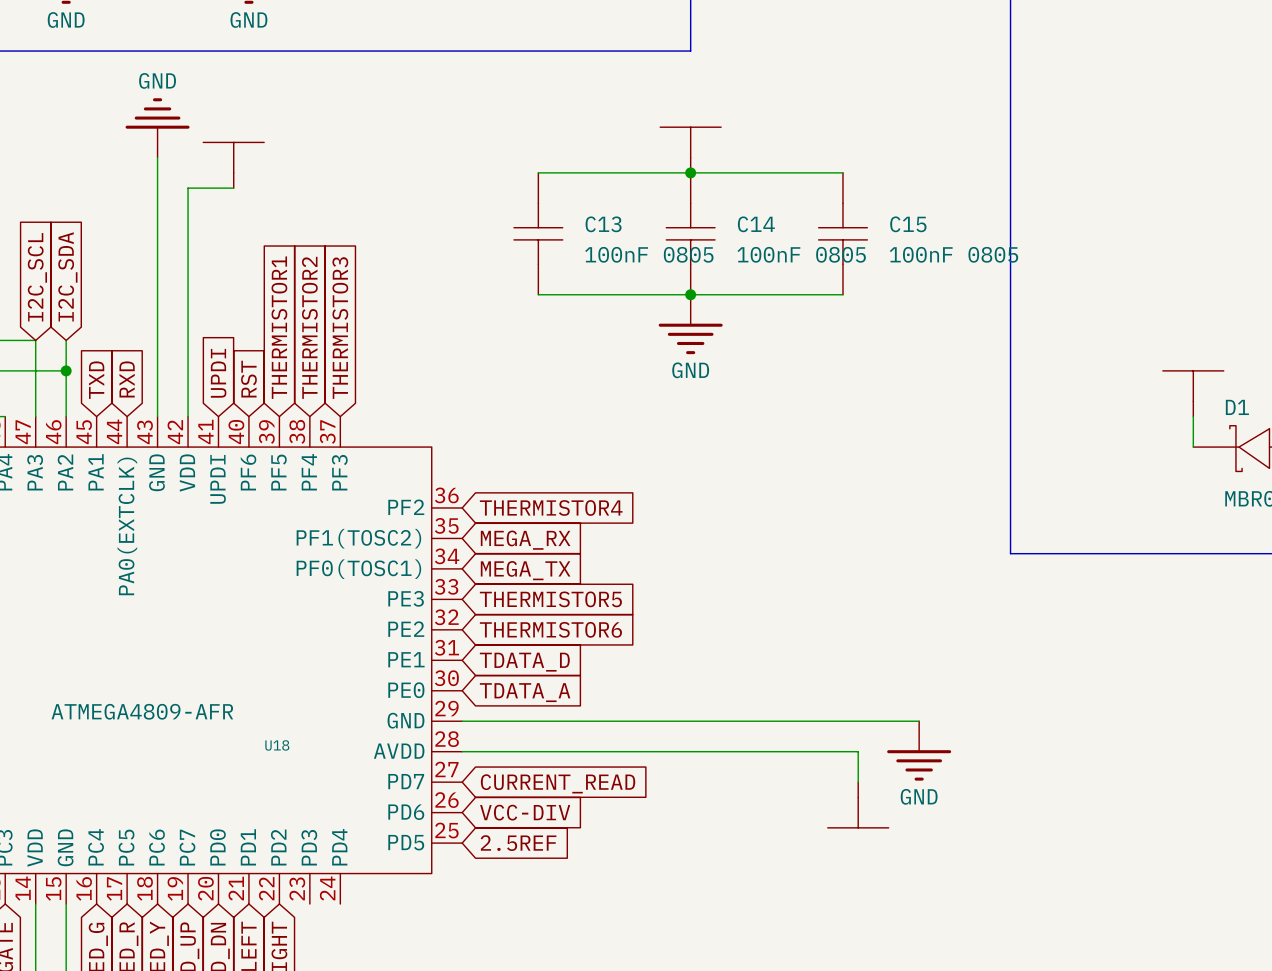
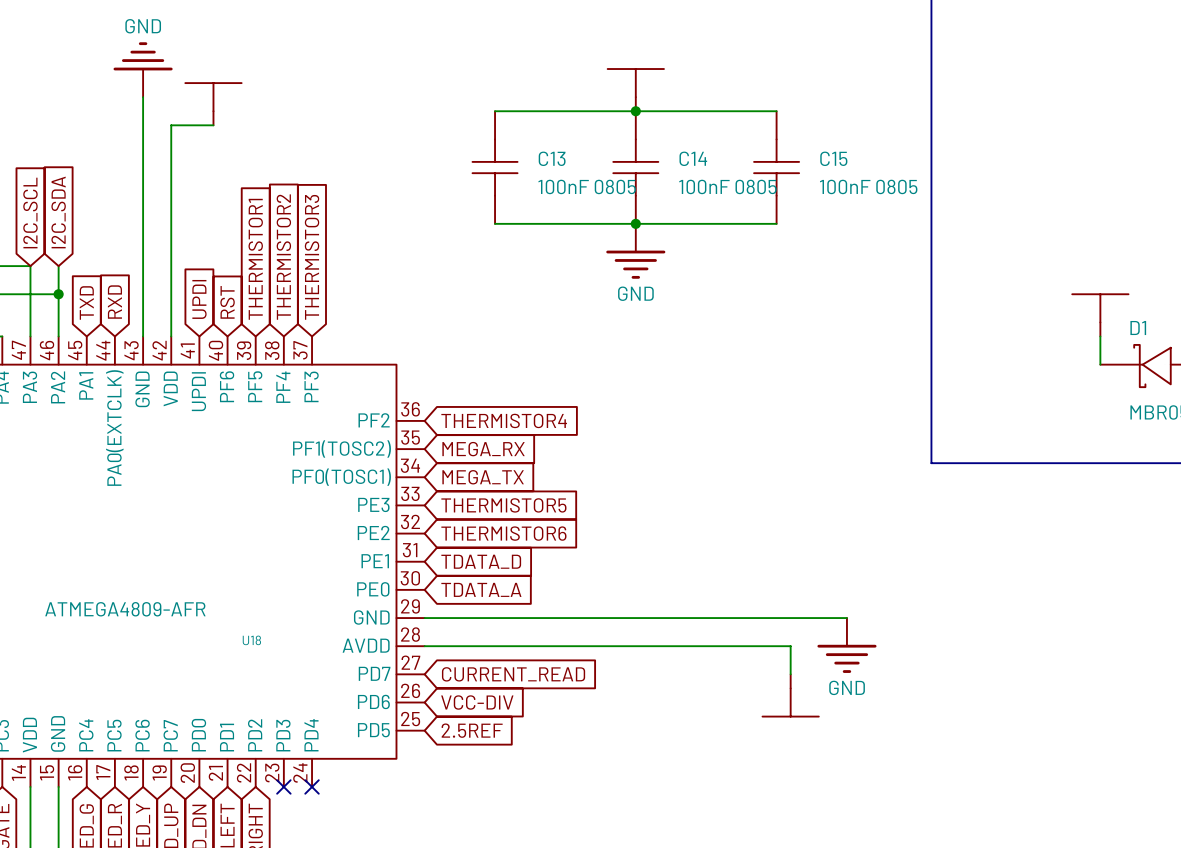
no-connect mark: none -> (283, 786)
no-connect mark: none -> (312, 786)

